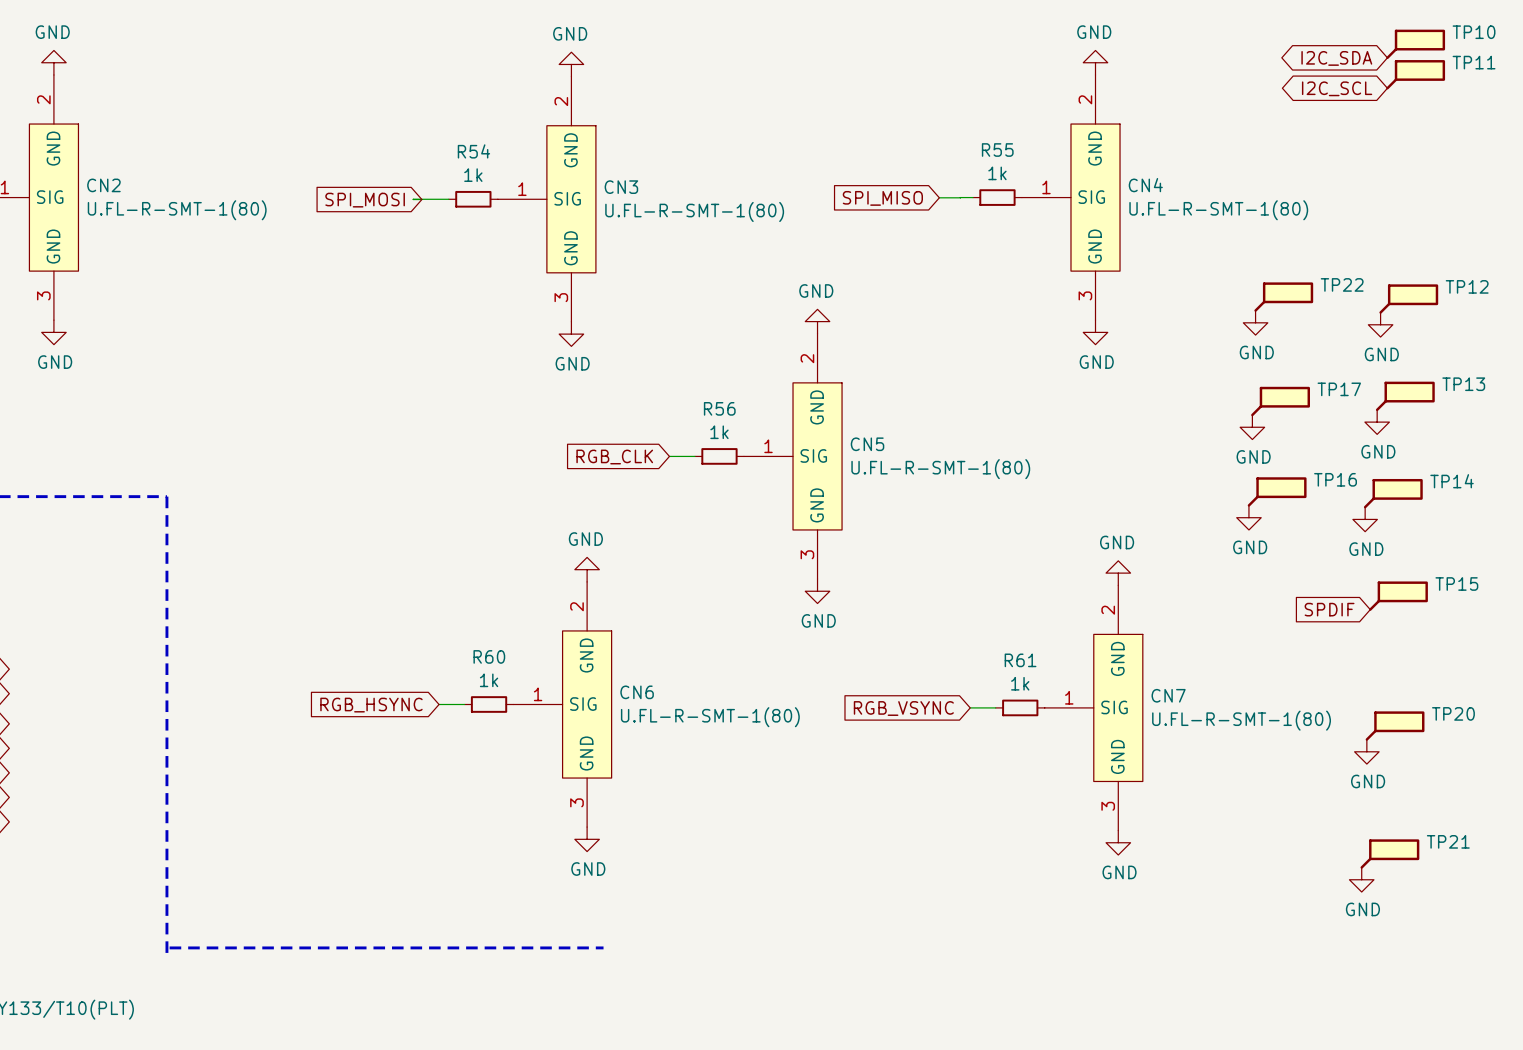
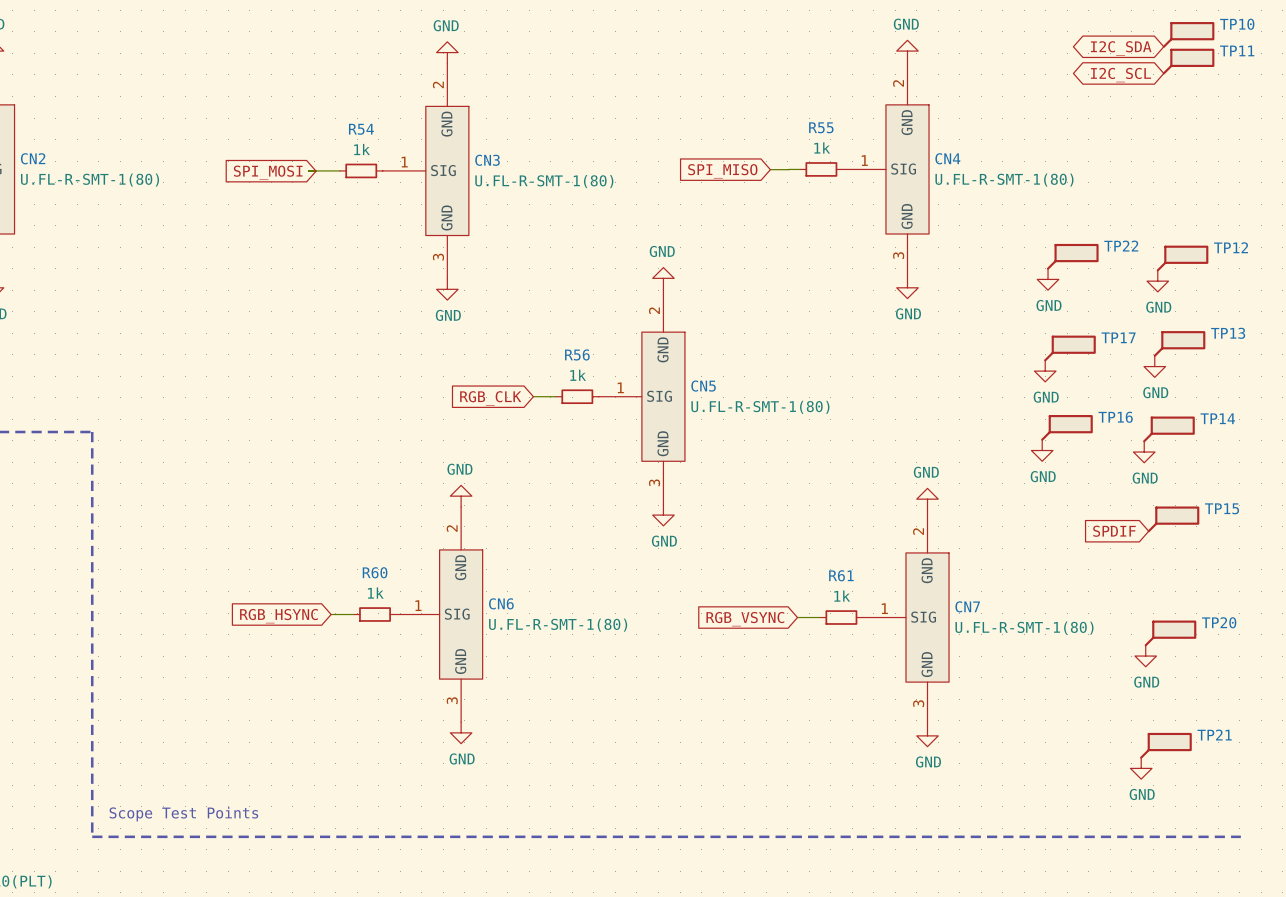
text: none -> Scope Test Points (183, 814)
line: (169, 947) (603, 947) -> none
line: none -> (92, 836) (1240, 836)

